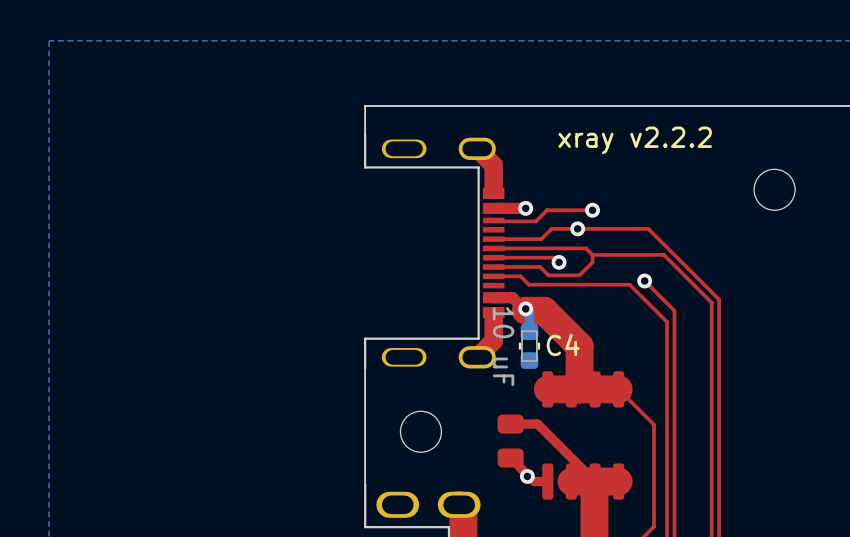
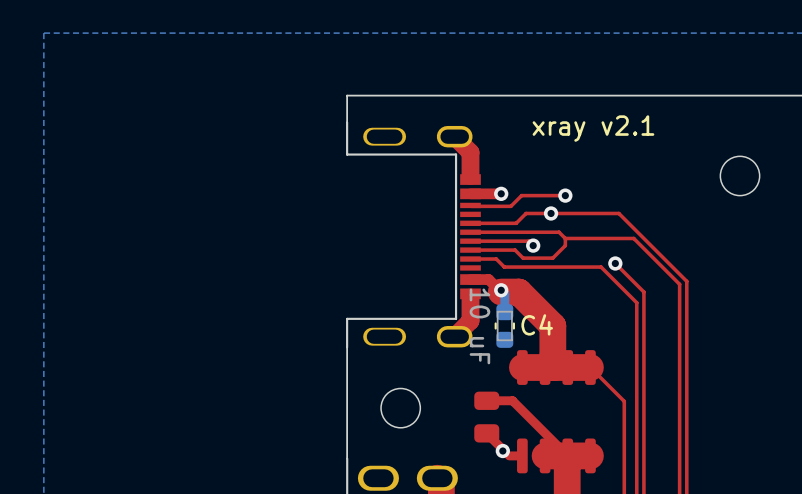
text: xray v2.2.2 (635, 140) -> xray v2.1 (593, 128)

